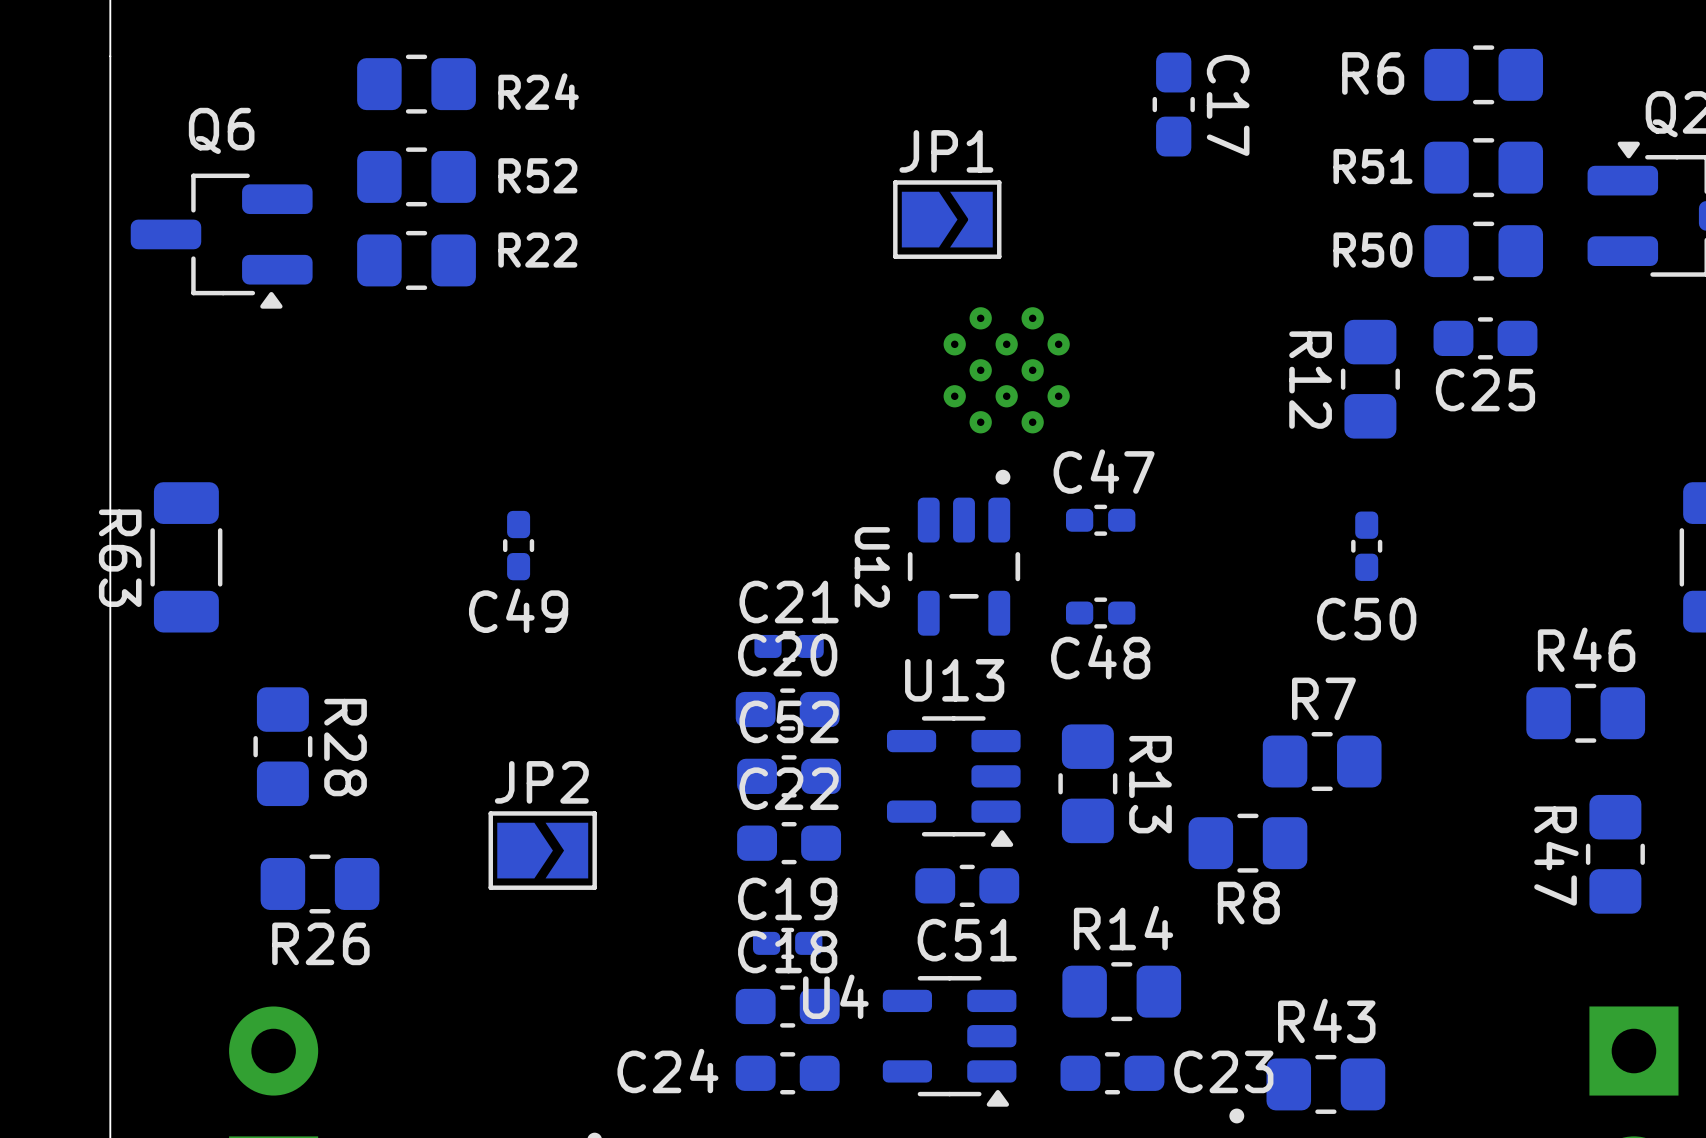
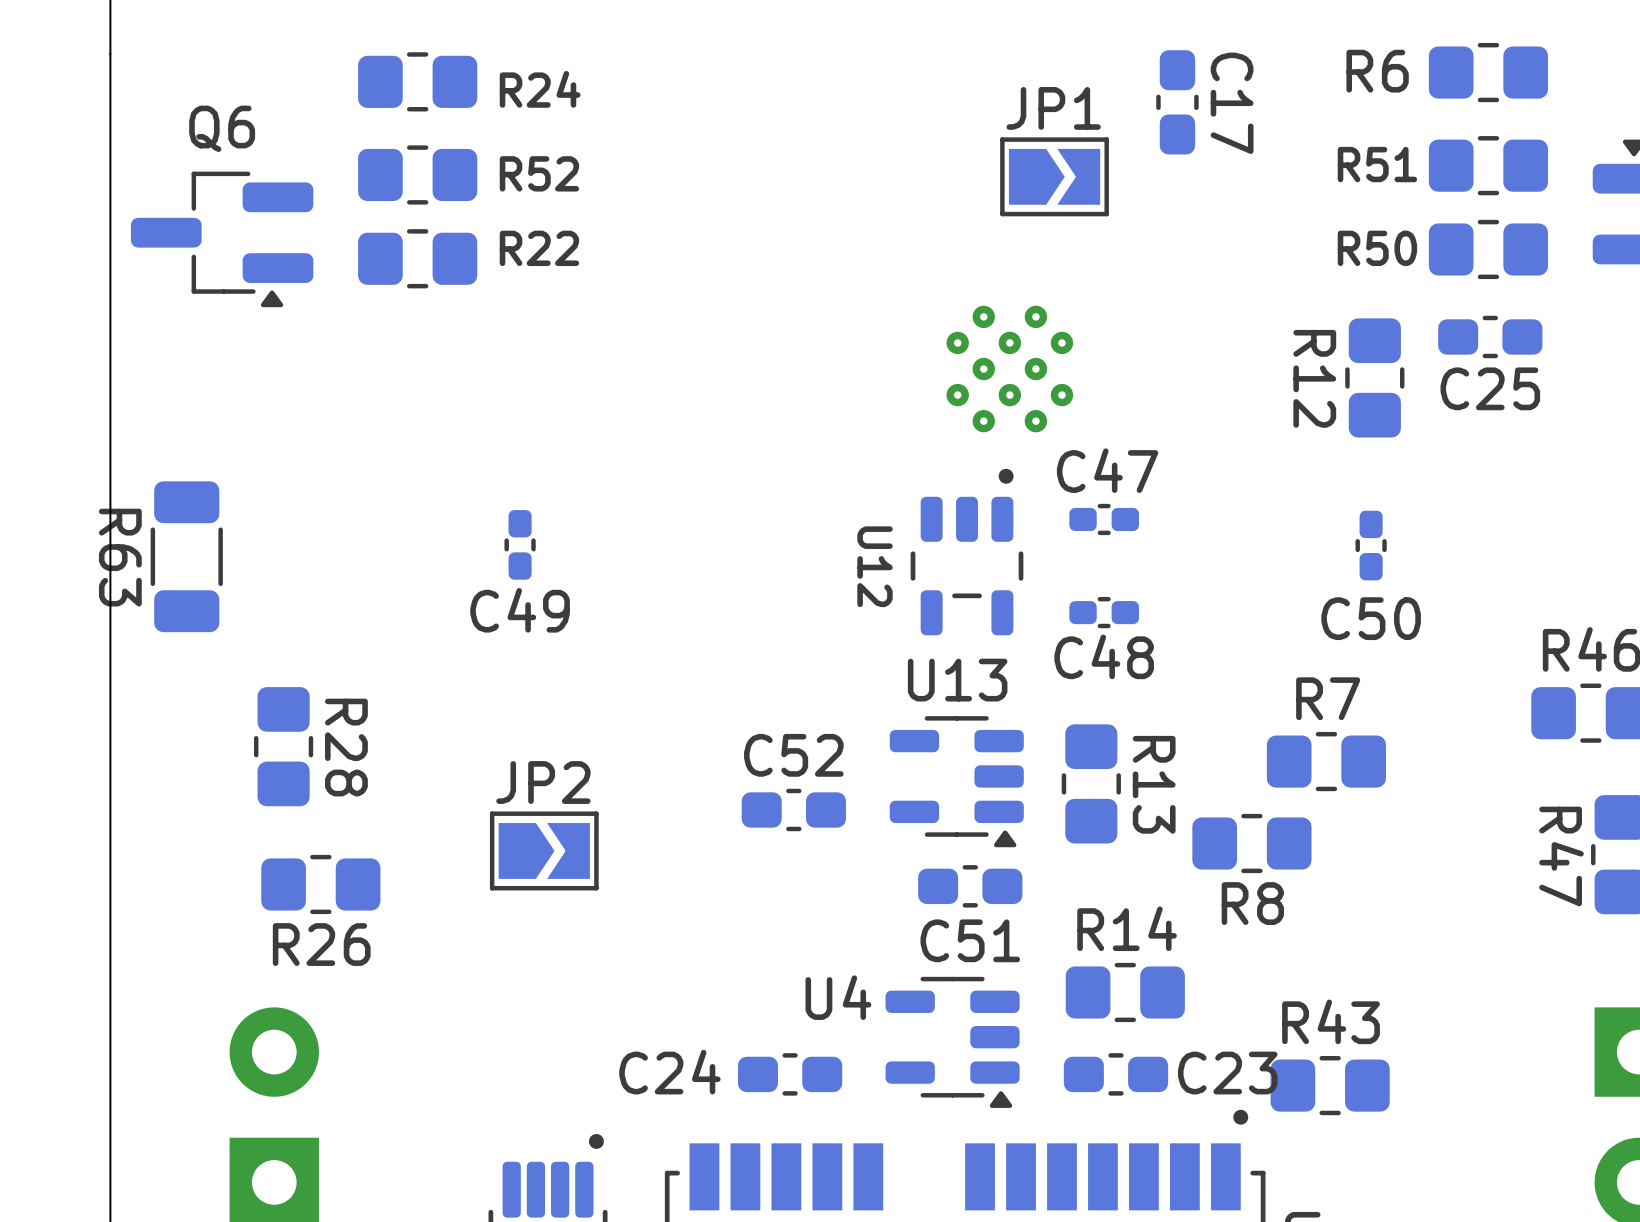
JP1 position: (947, 219) -> (1054, 176)
C21: (789, 646) -> none
C20: (787, 709) -> none
C52 position: (789, 776) -> (793, 809)
C22: (789, 843) -> none
C19: (787, 943) -> none
C18: (787, 1006) -> none

